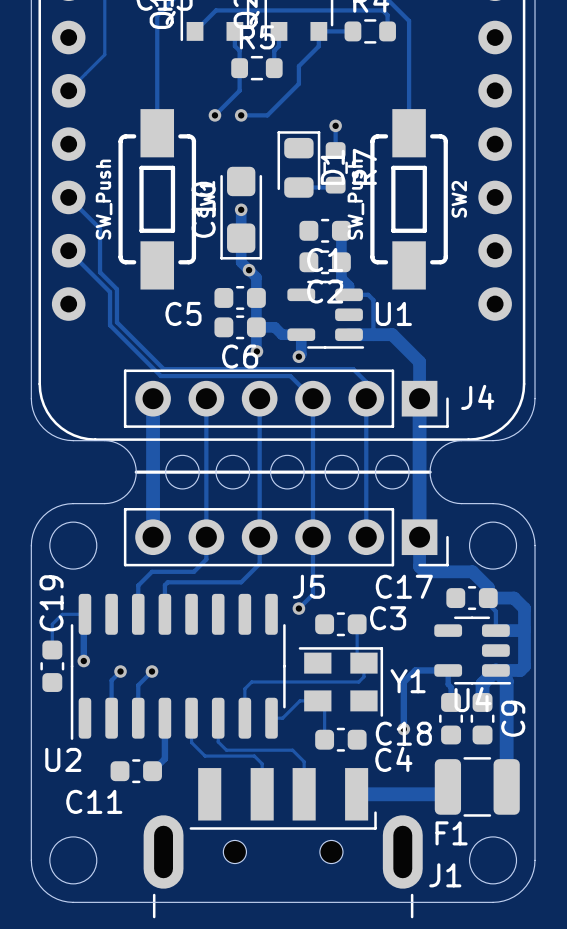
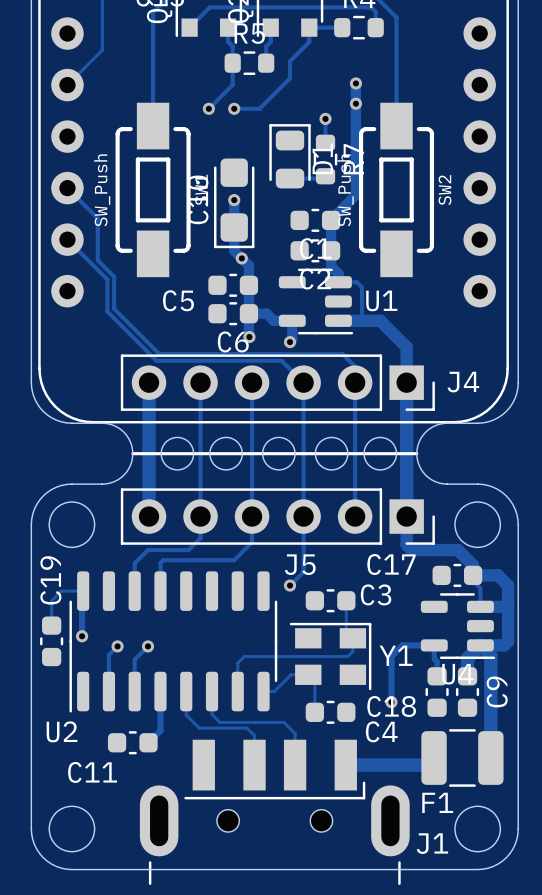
track: none -> (355, 83) (355, 195) (331, 220)
via: none -> (355, 83)
via: none -> (355, 103)

